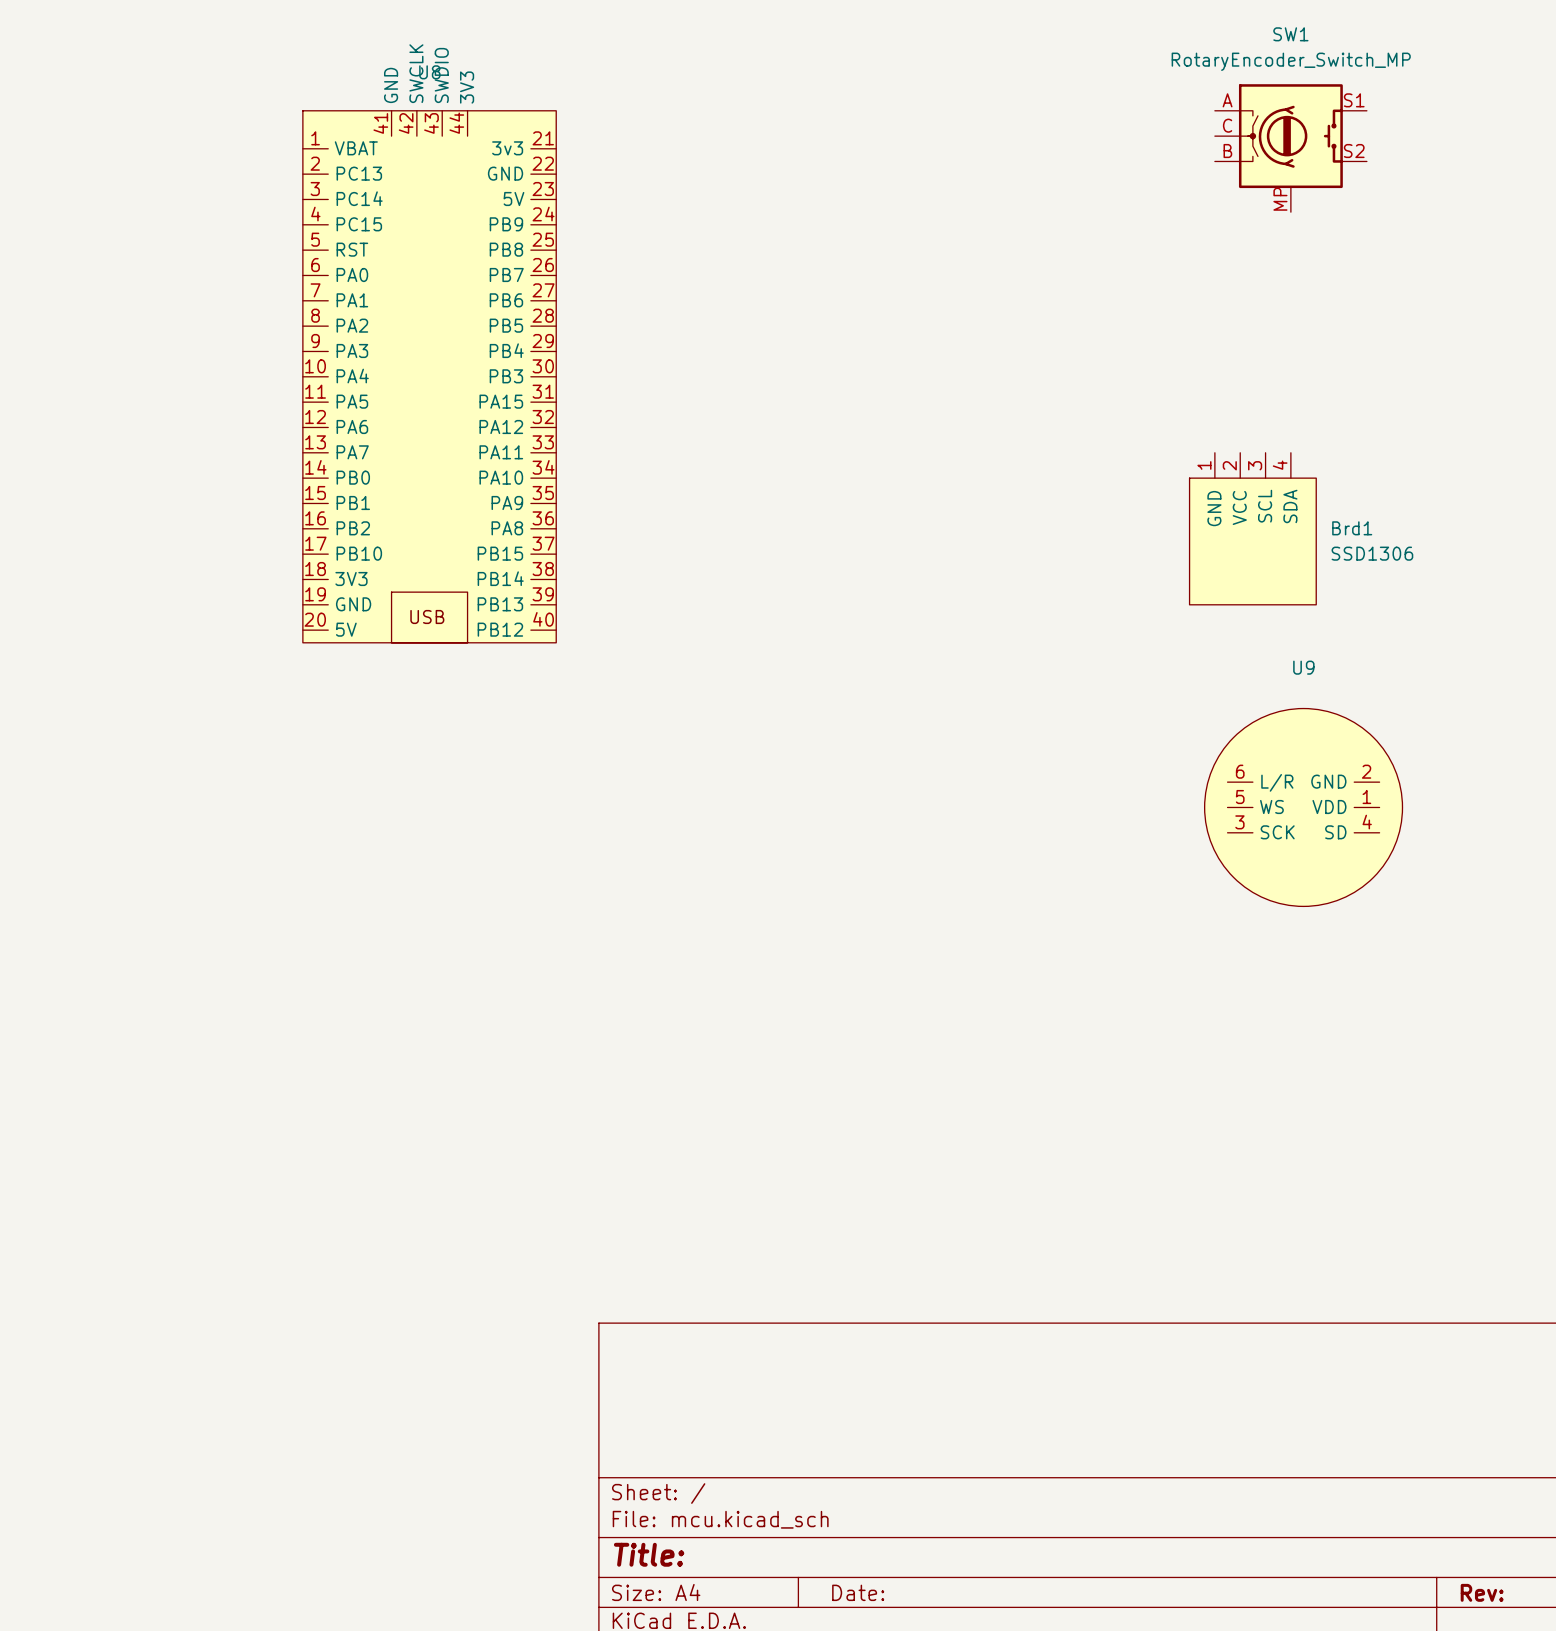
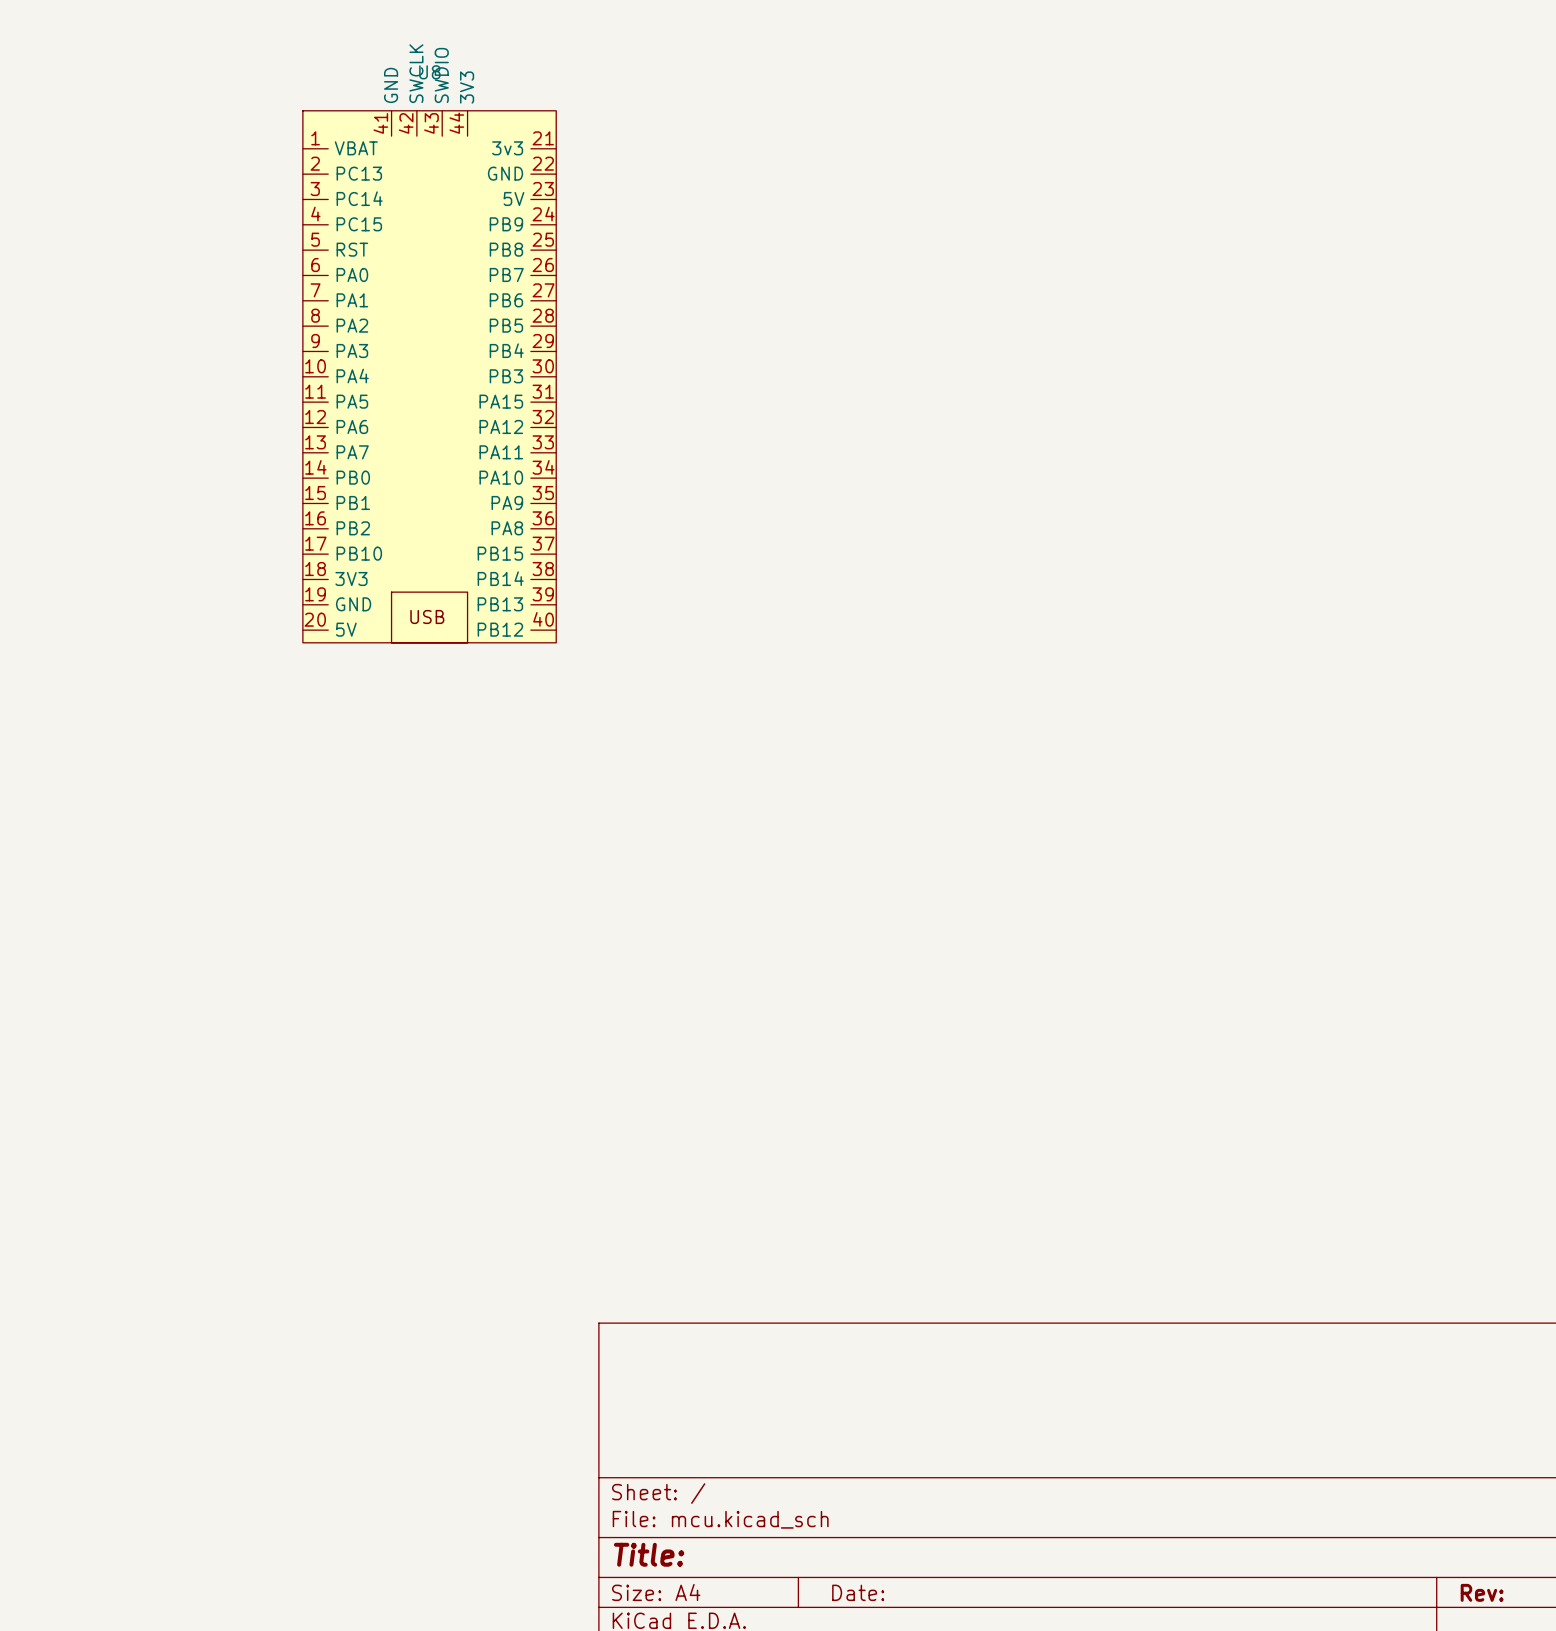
SW1: RotaryEncoder_Switch_MP (1290, 148) -> none
Brd1: SSD1306 (1252, 528) -> none
U9: (1303, 807) -> none

